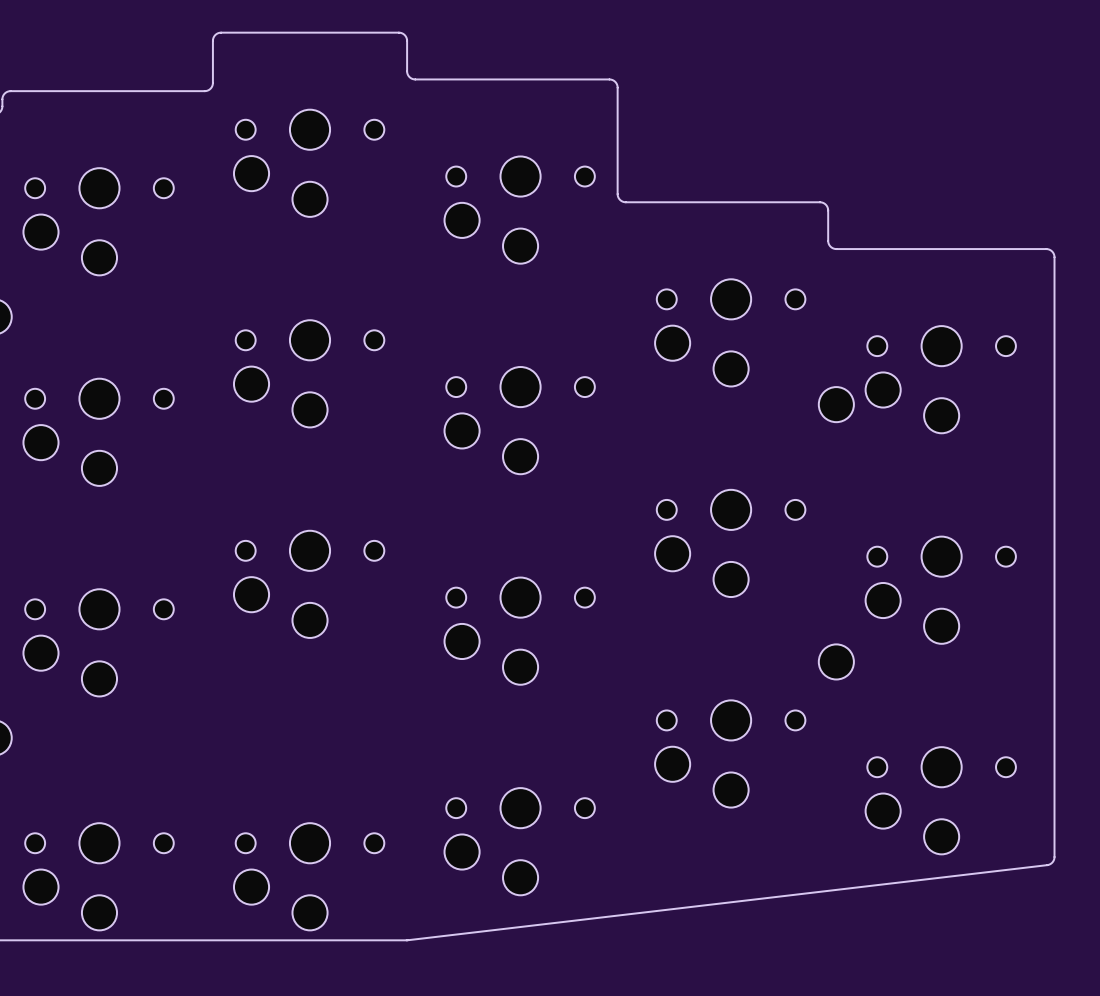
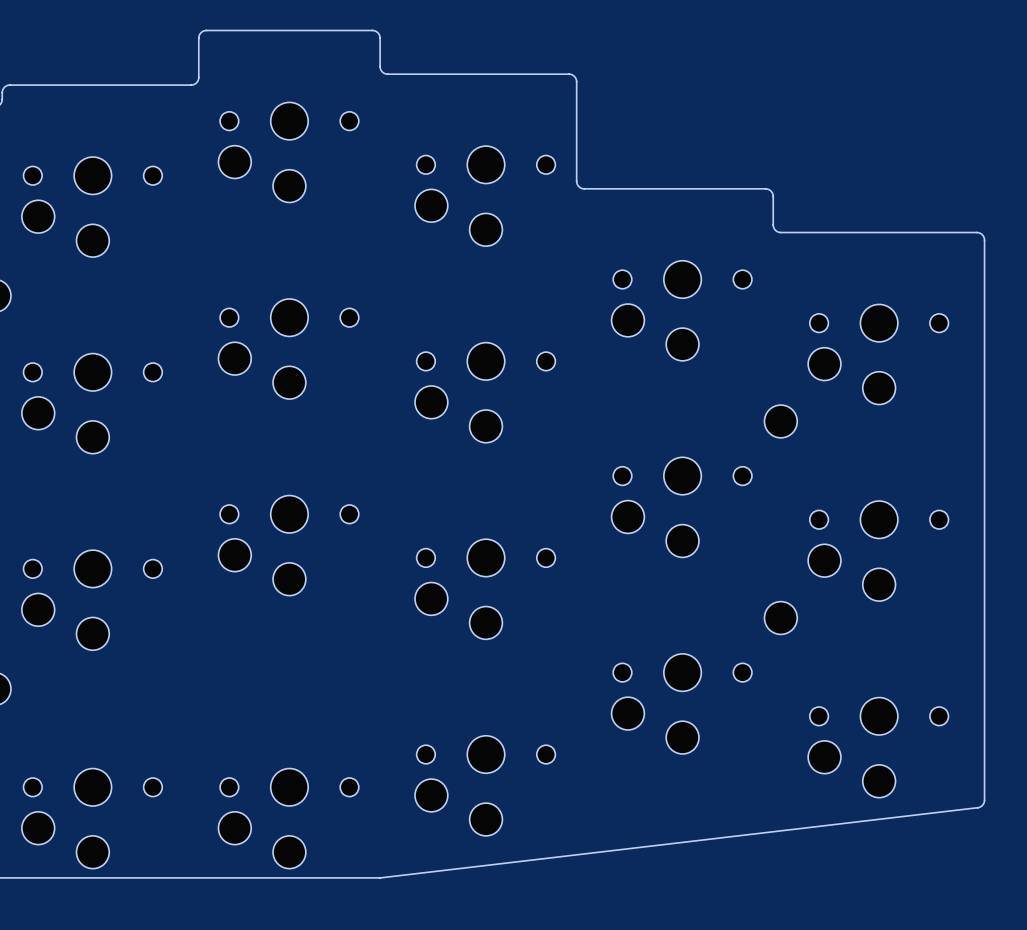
part position: (836, 404) -> (780, 421)

